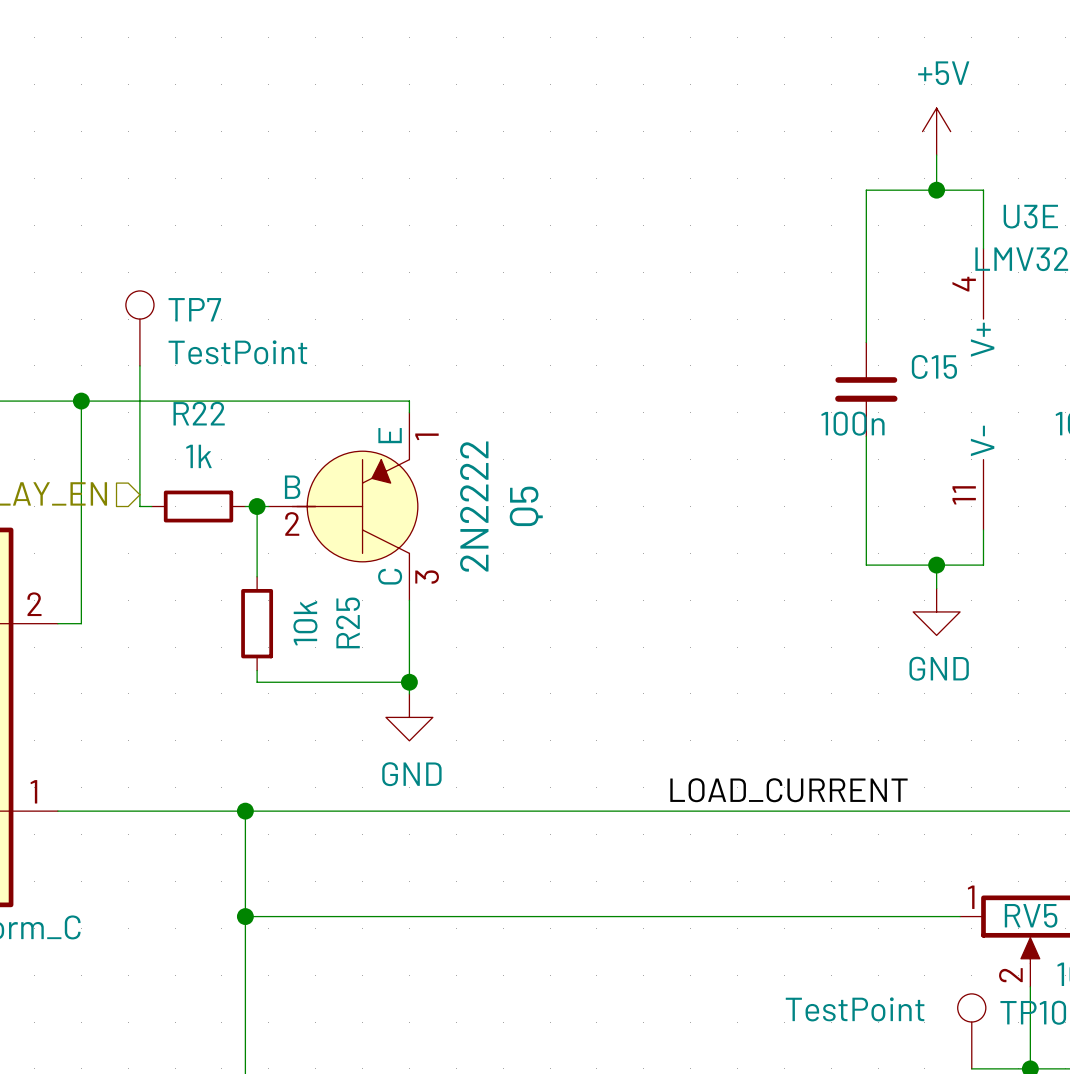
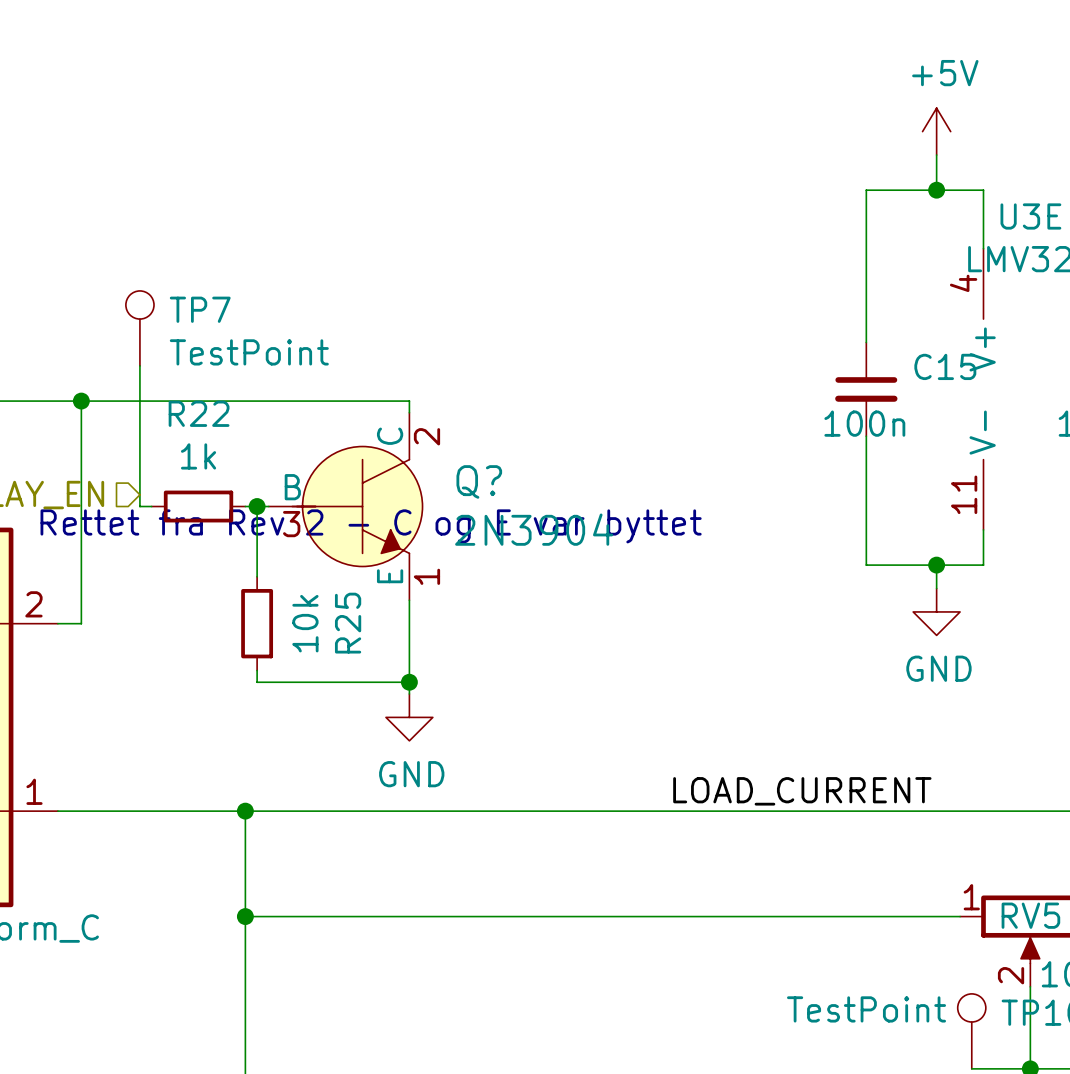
Q5: 2N2222 (343, 506) -> none
Q?: none -> 2N3904 (345, 506)
text: none -> Rettet fra Rev 2 - C og E var byttet (371, 526)

